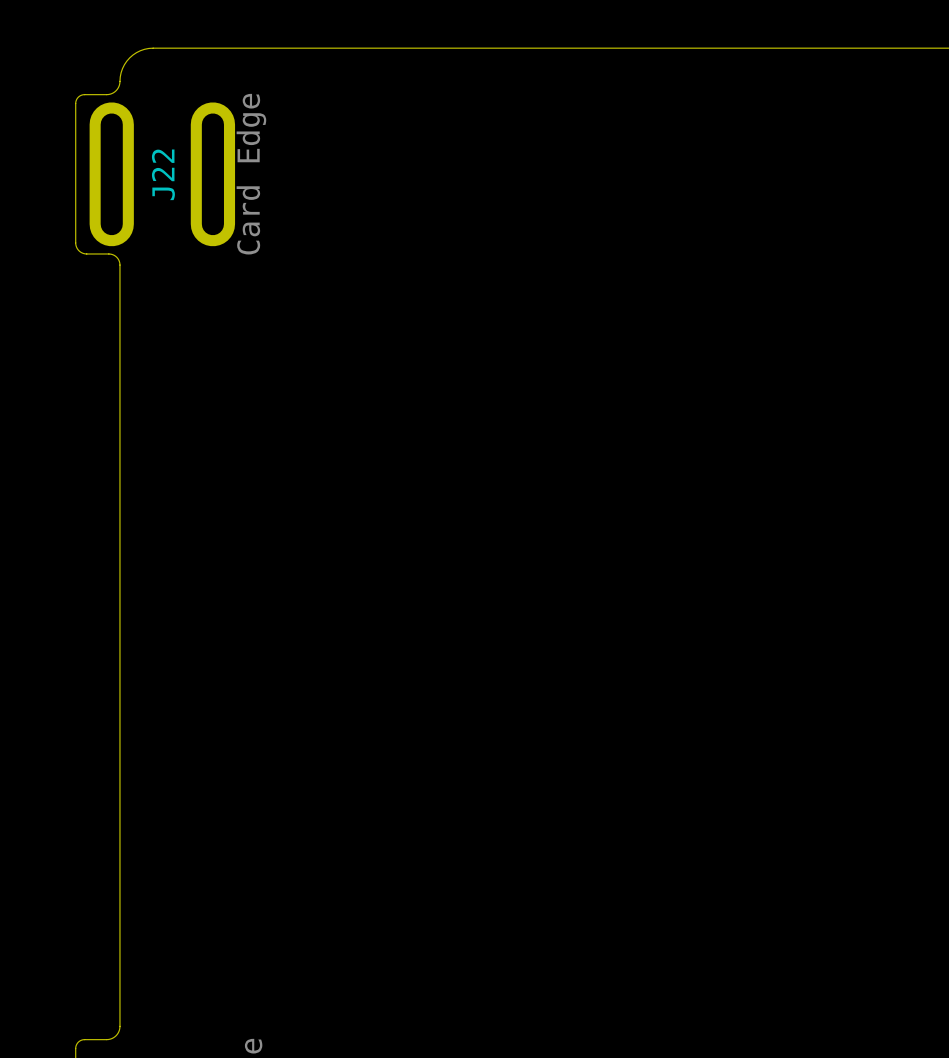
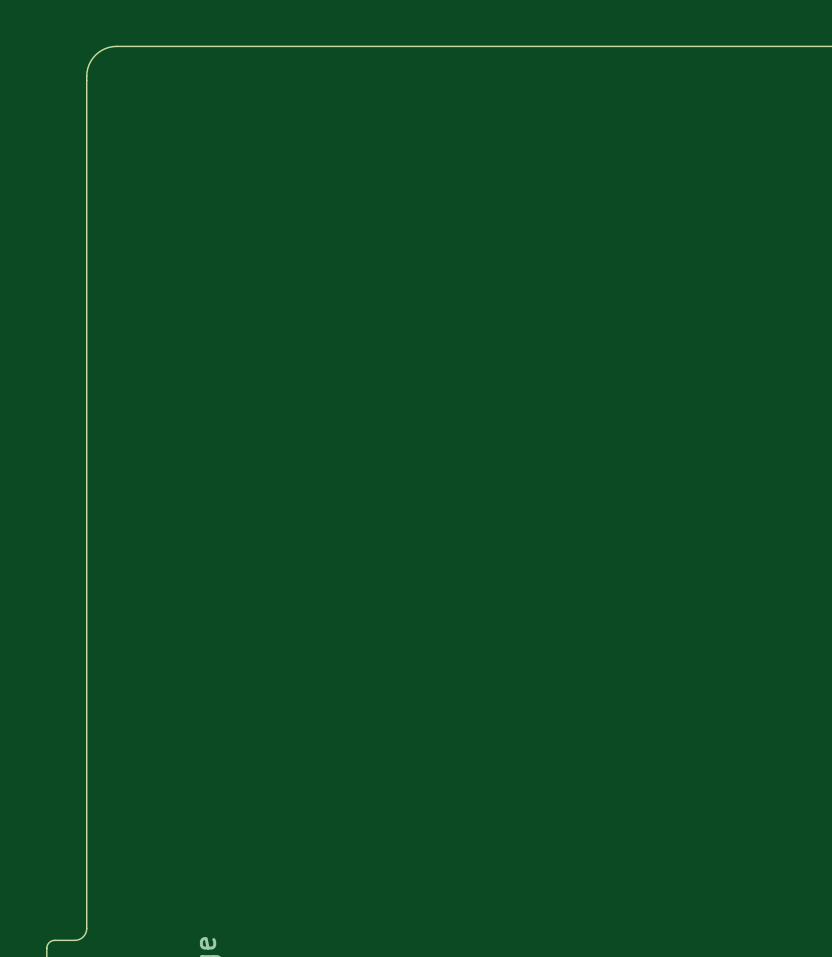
board edge: (119, 81) (118, 88) (113, 92) (82, 94) (77, 98) (75, 103) (76, 245) (83, 253) (113, 254) (117, 258) (119, 265) -> (86, 76) (86, 241)
J22: Card Edge (162, 174) -> none

